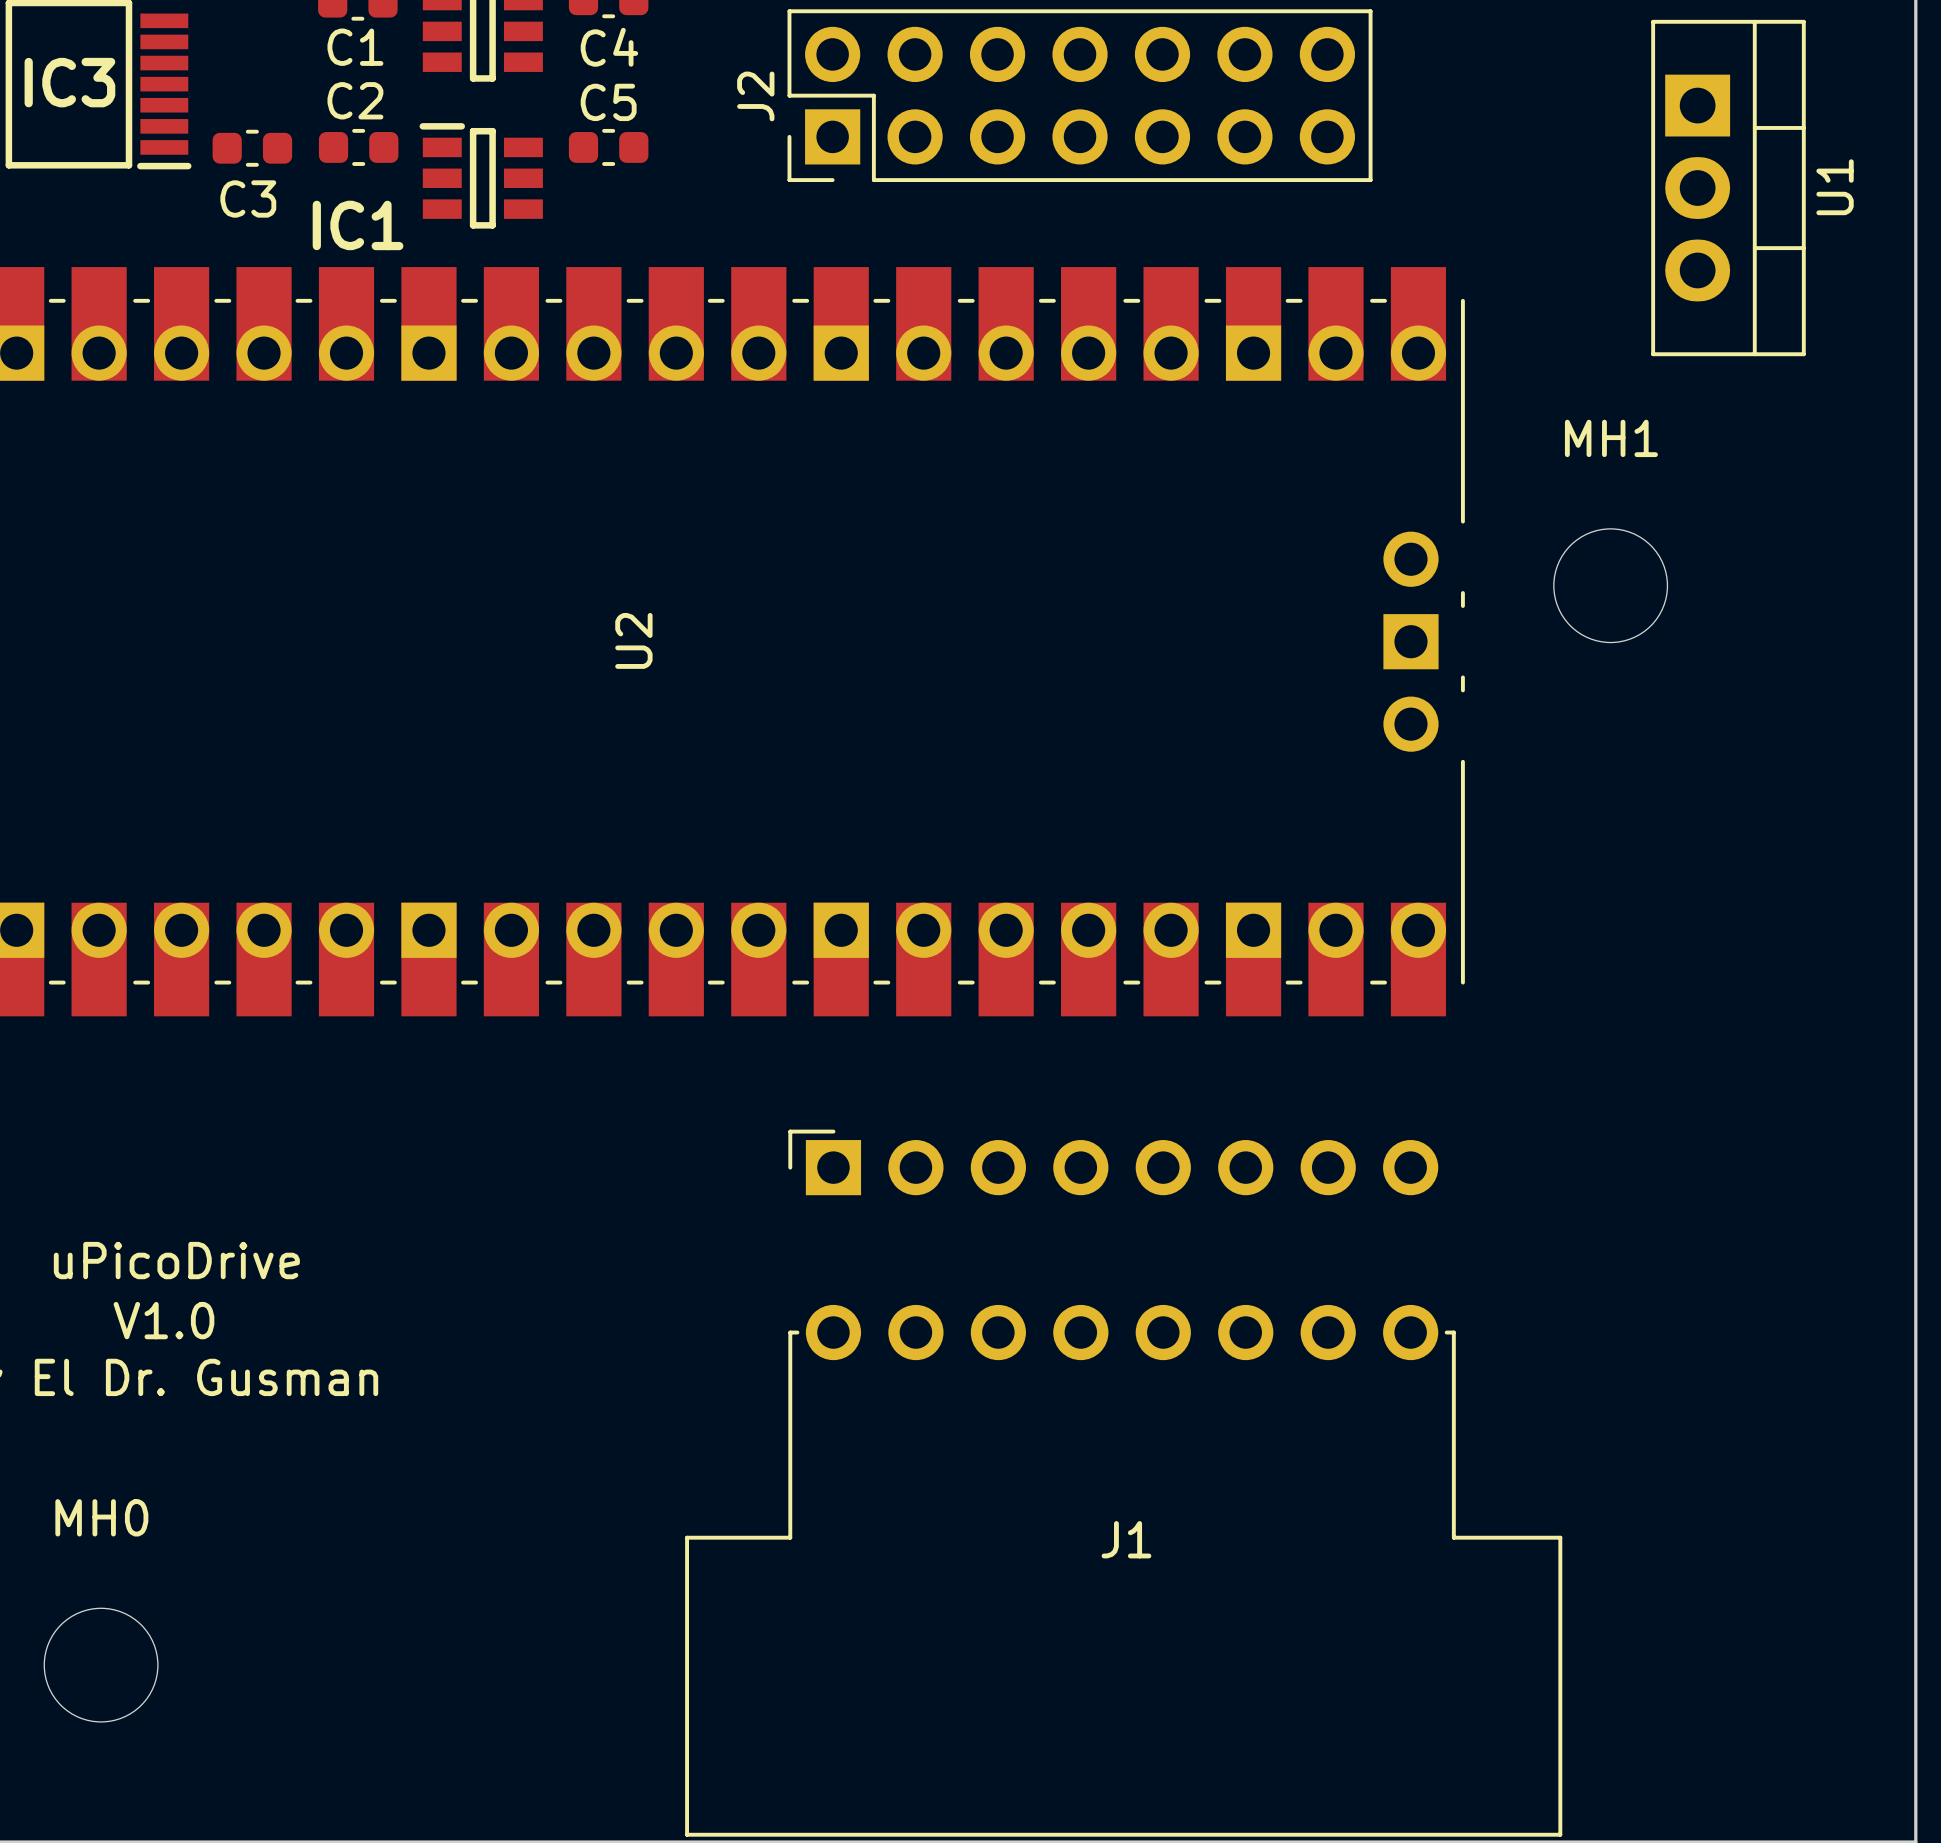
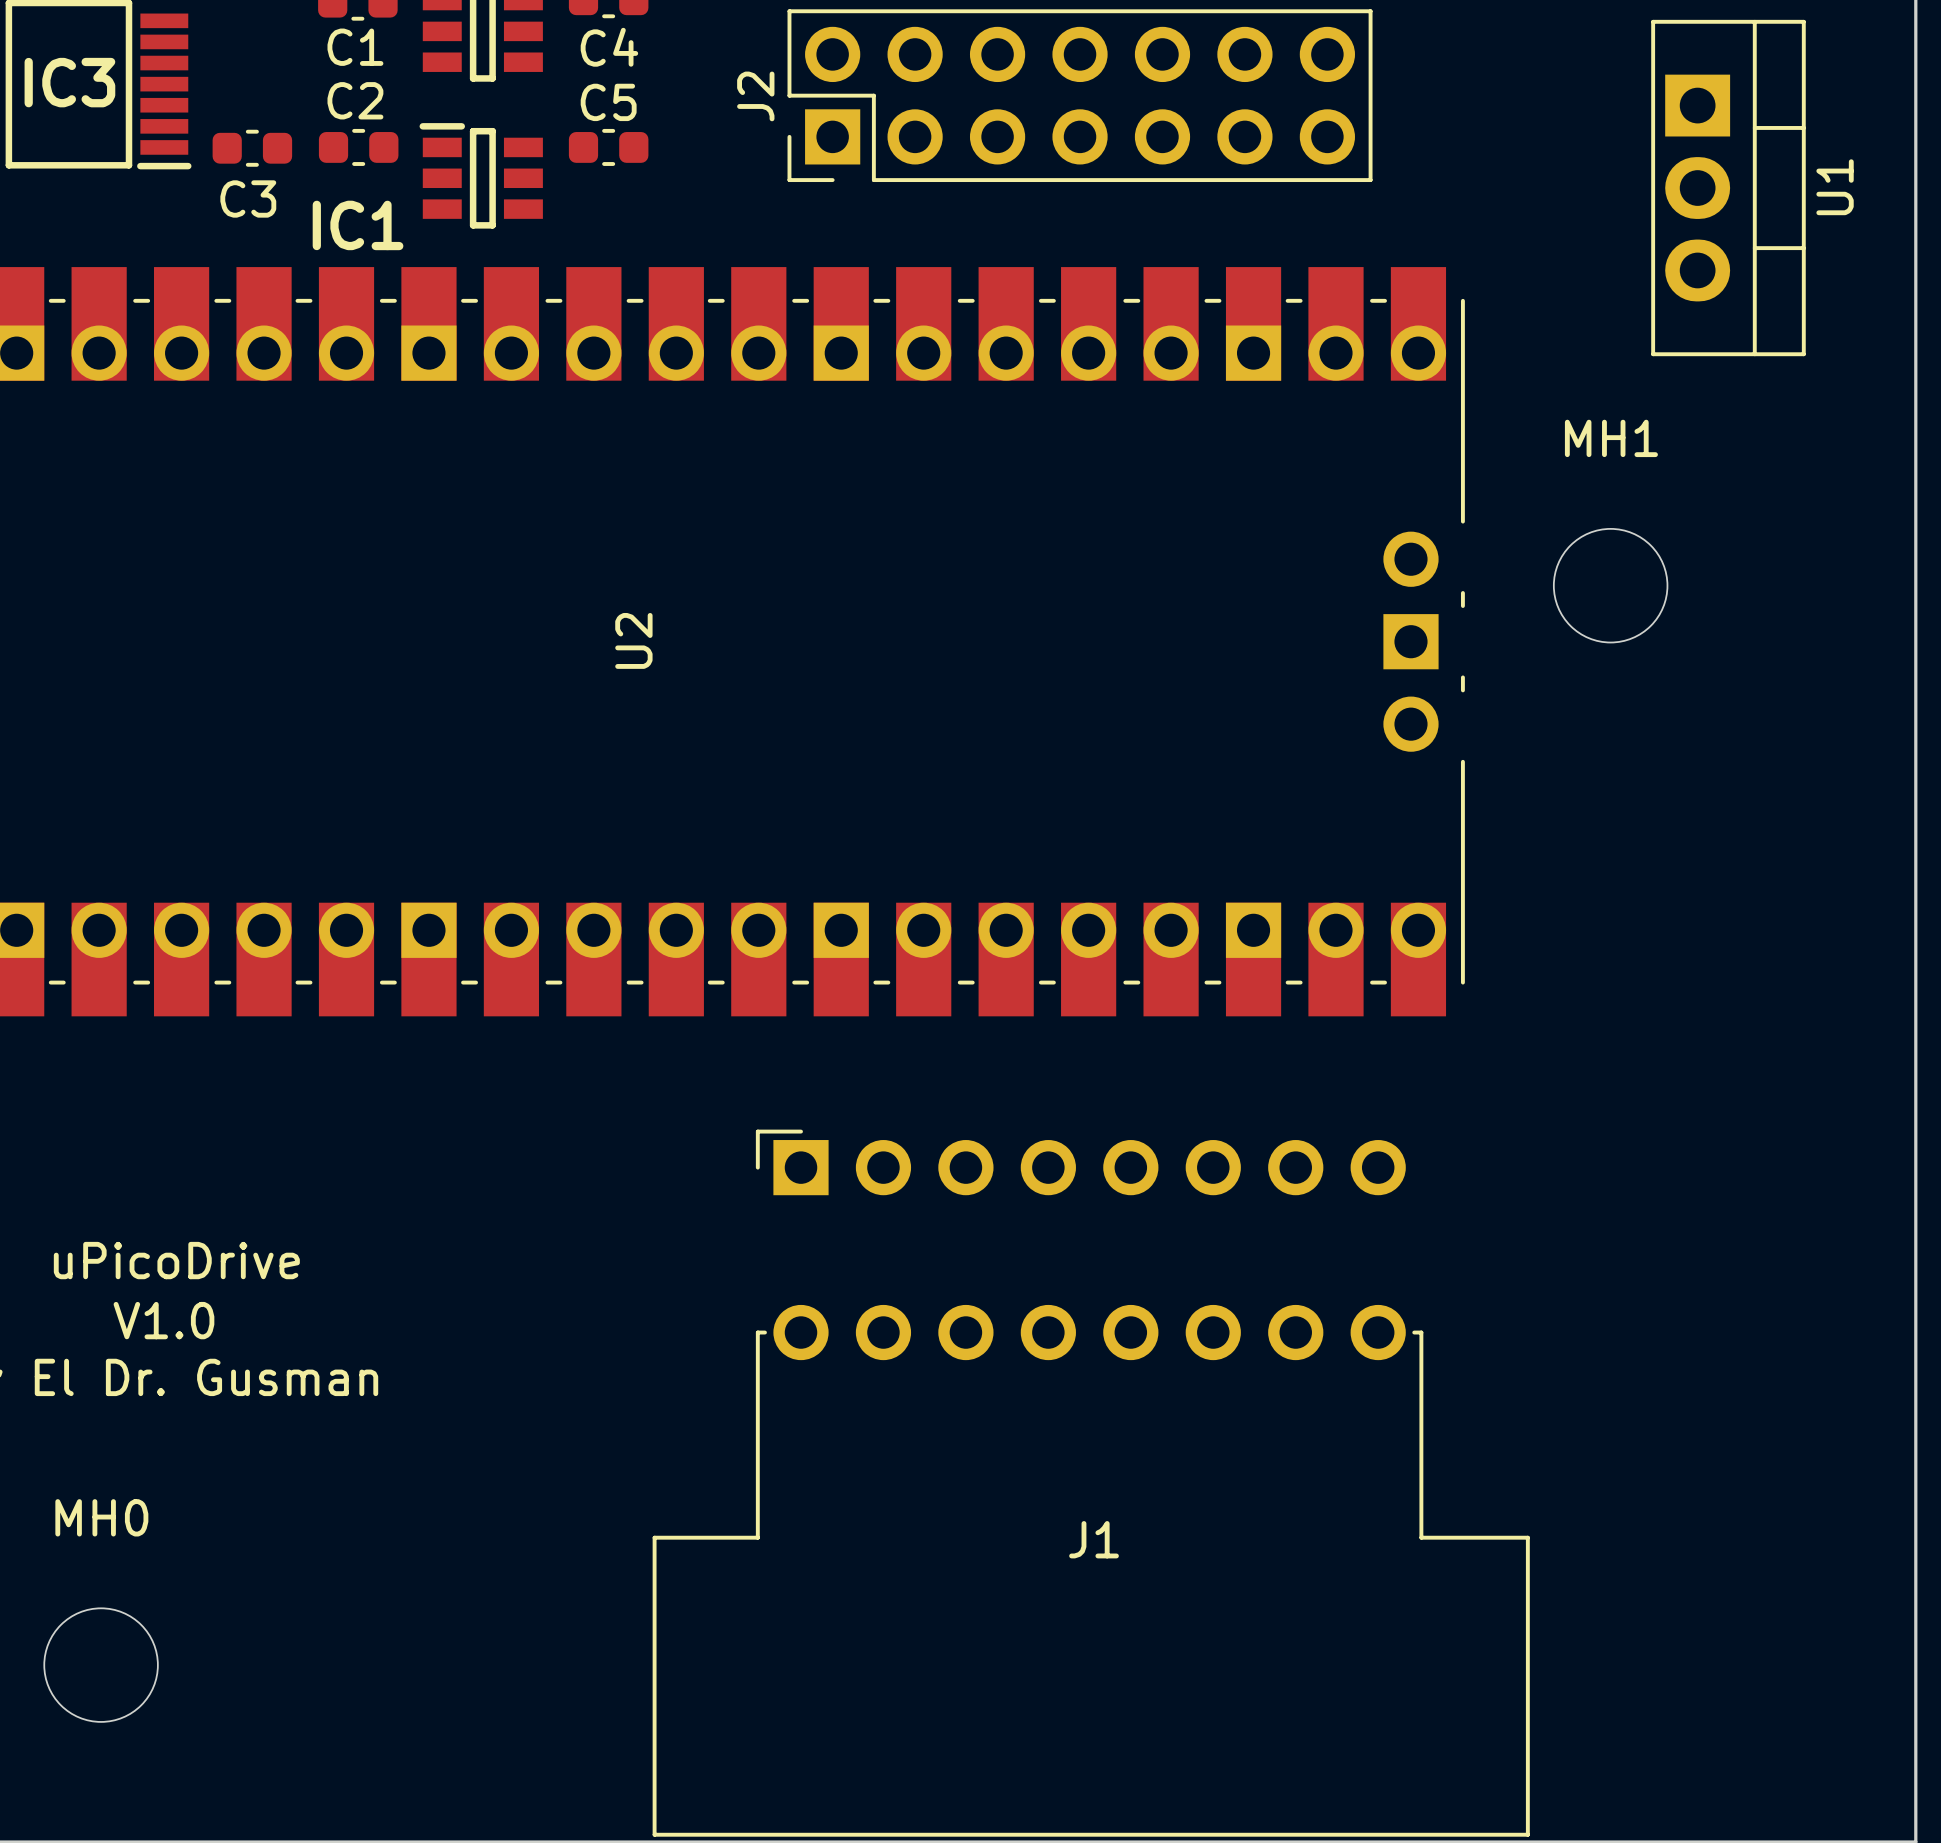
J1 position: (1123, 1483) -> (1091, 1483)

